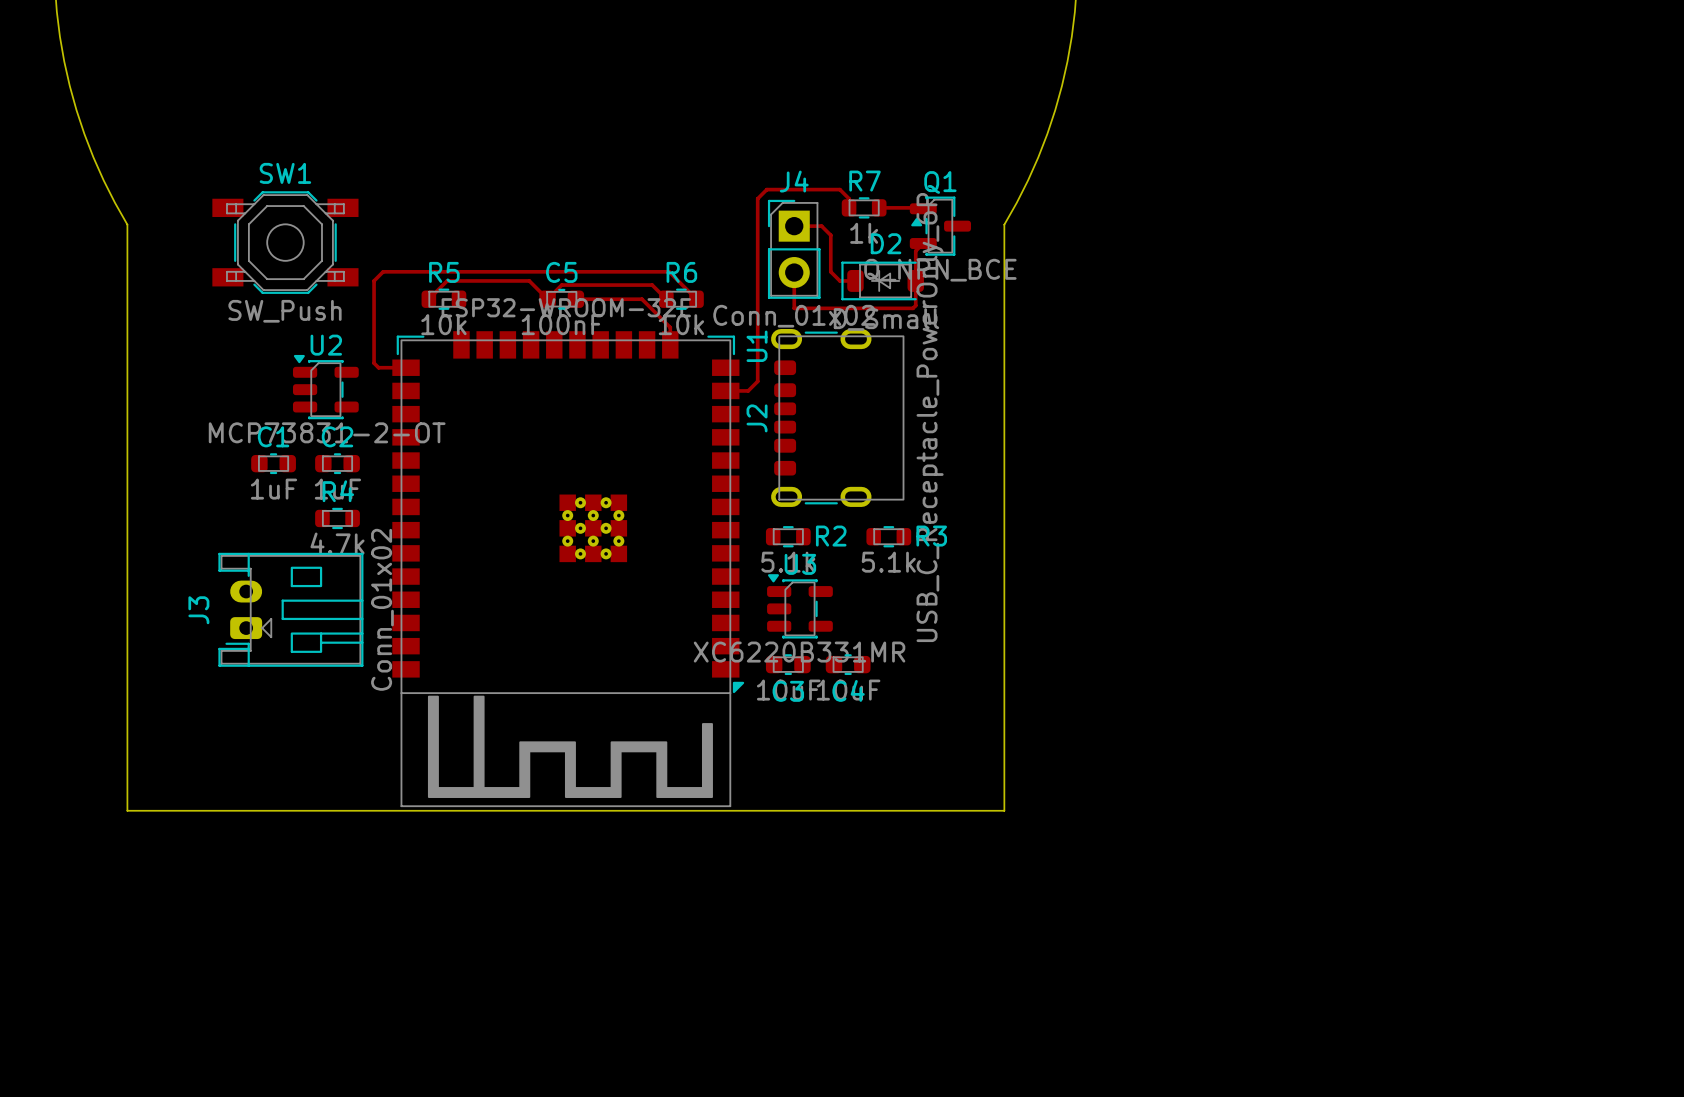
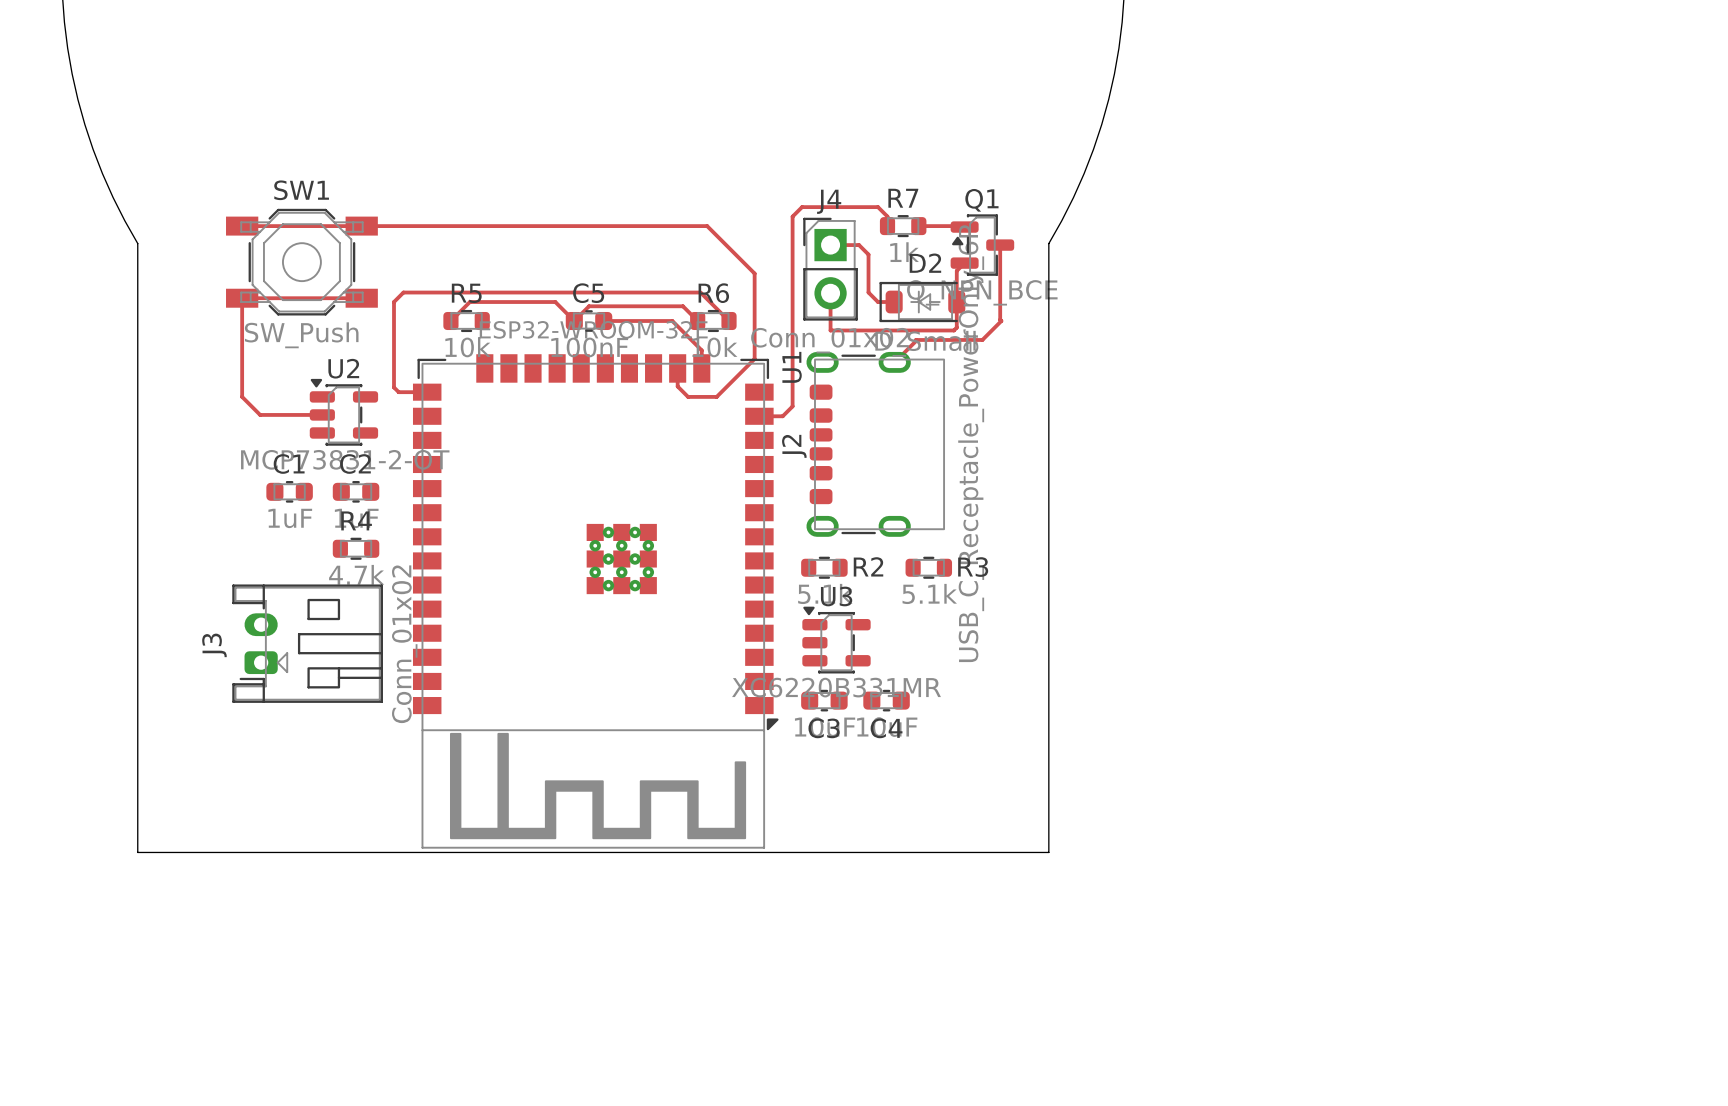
top track: none -> (242, 226) (707, 226) (754, 273) (754, 358) (716, 396) (688, 396) (677, 386) (677, 368)
top track: none -> (1000, 245) (1001, 321) (982, 339) (915, 339) (894, 362)
top track: none -> (242, 292) (242, 396) (260, 414) (322, 414)
top track: none -> (242, 298) (361, 298)

